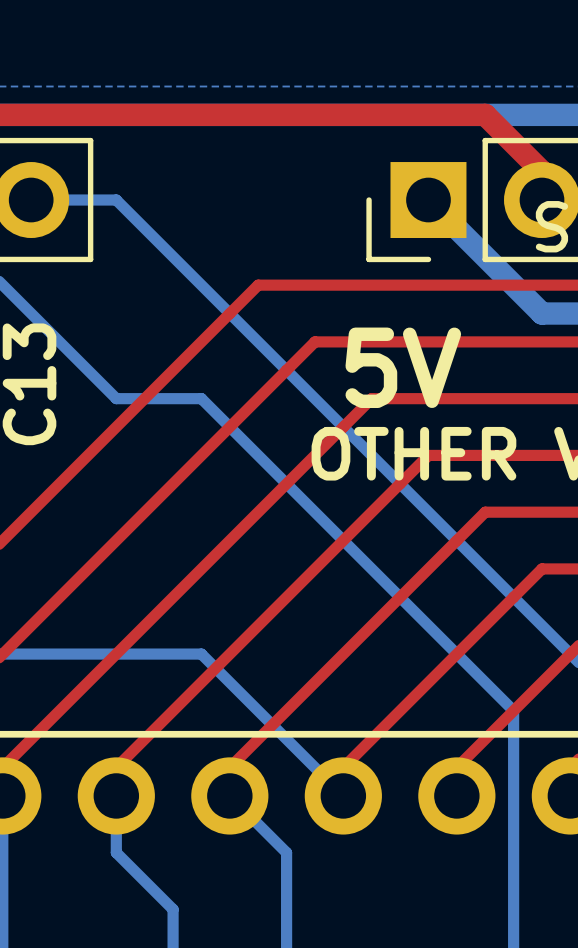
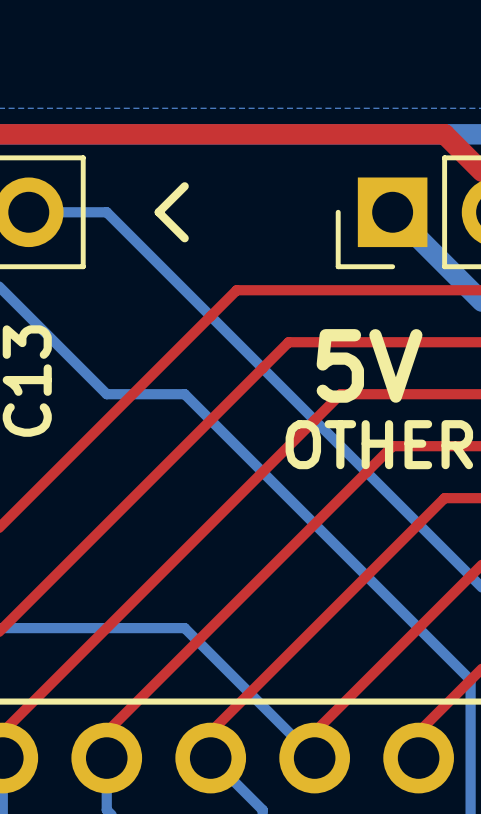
line: none -> (184, 186) (158, 212) (184, 238)

